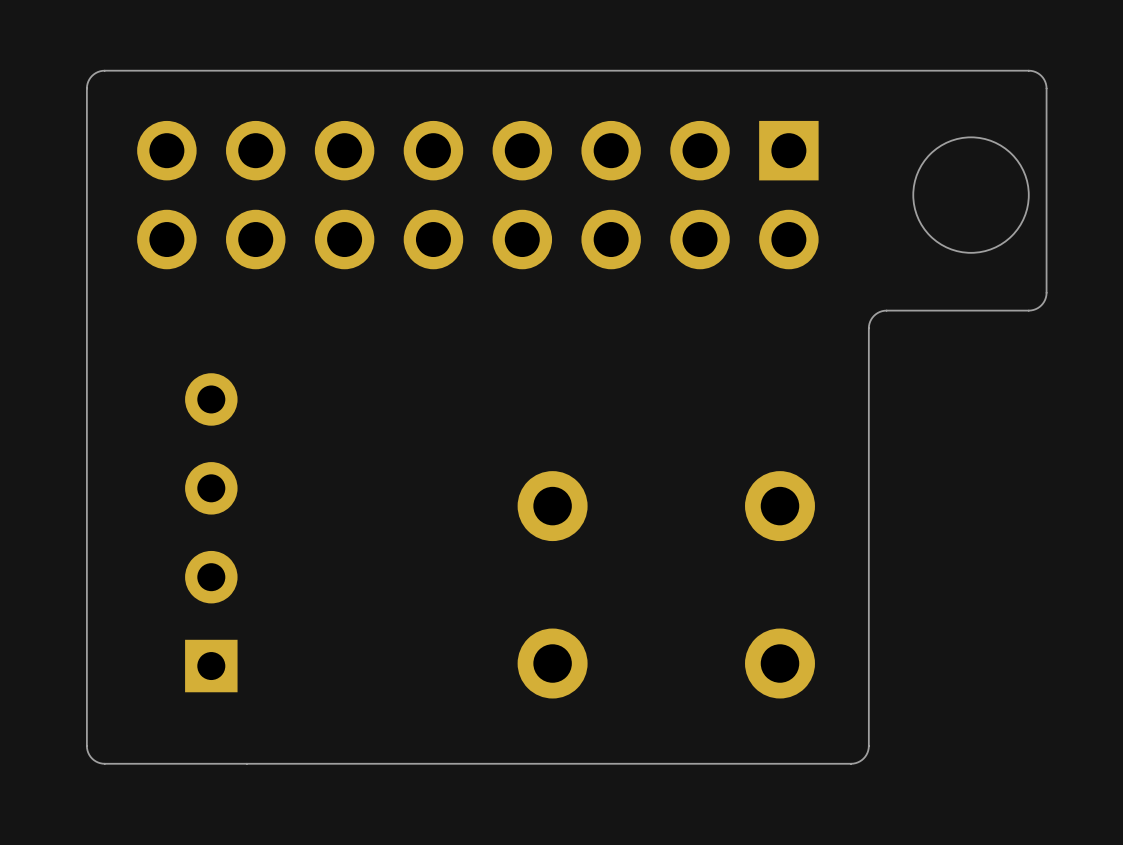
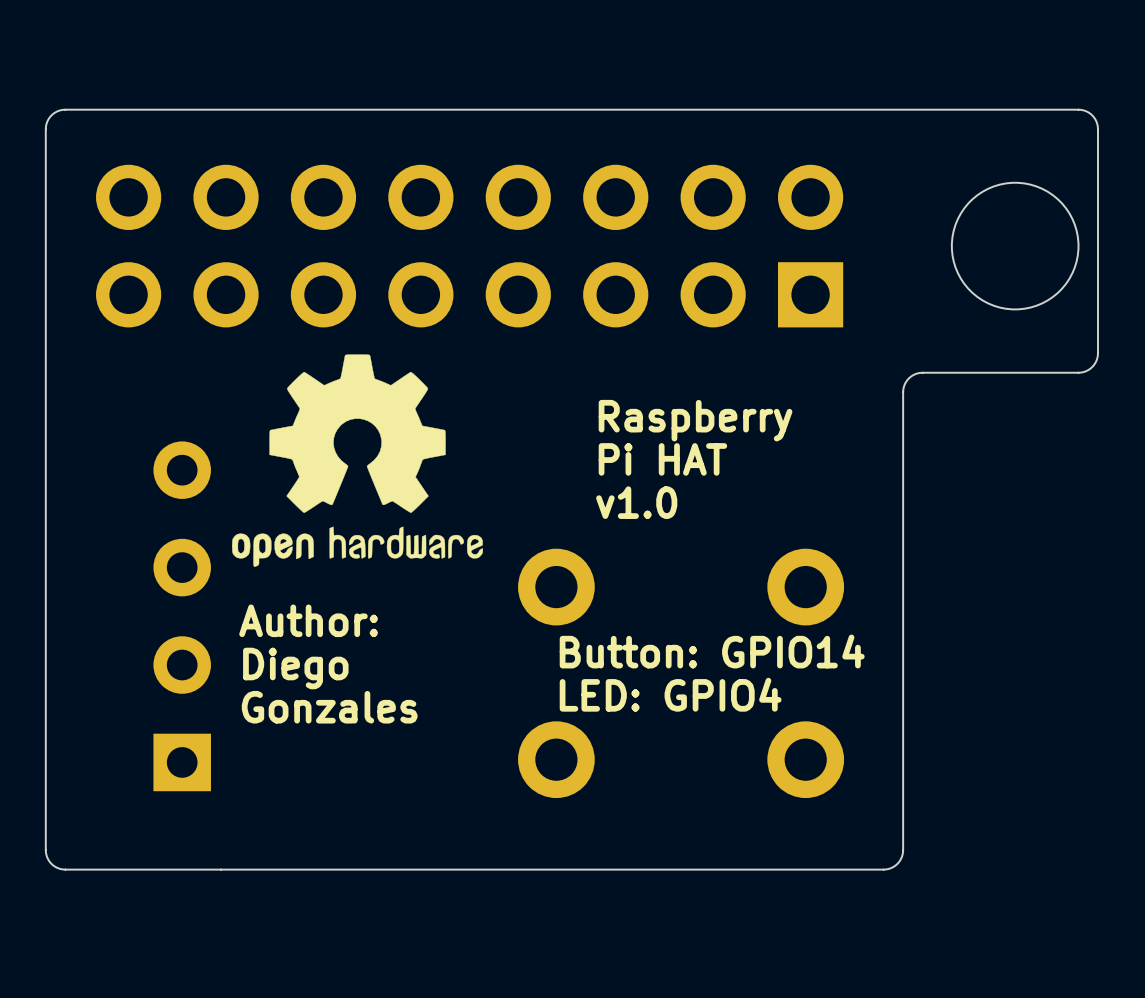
part footprint: [137, 120, 819, 270] -> [96, 164, 844, 328]
drawing: none -> [232, 354, 484, 567]
text: none -> Raspberry (695, 420)
text: none -> Pi HAT (662, 459)
text: none -> v1.0 (636, 502)
text: none -> Author: (308, 620)
text: none -> Button: GPIO14 (712, 651)
text: none -> Diego (295, 668)
text: none -> LED: GPIO4 (670, 694)
text: none -> Gonzales (329, 707)

